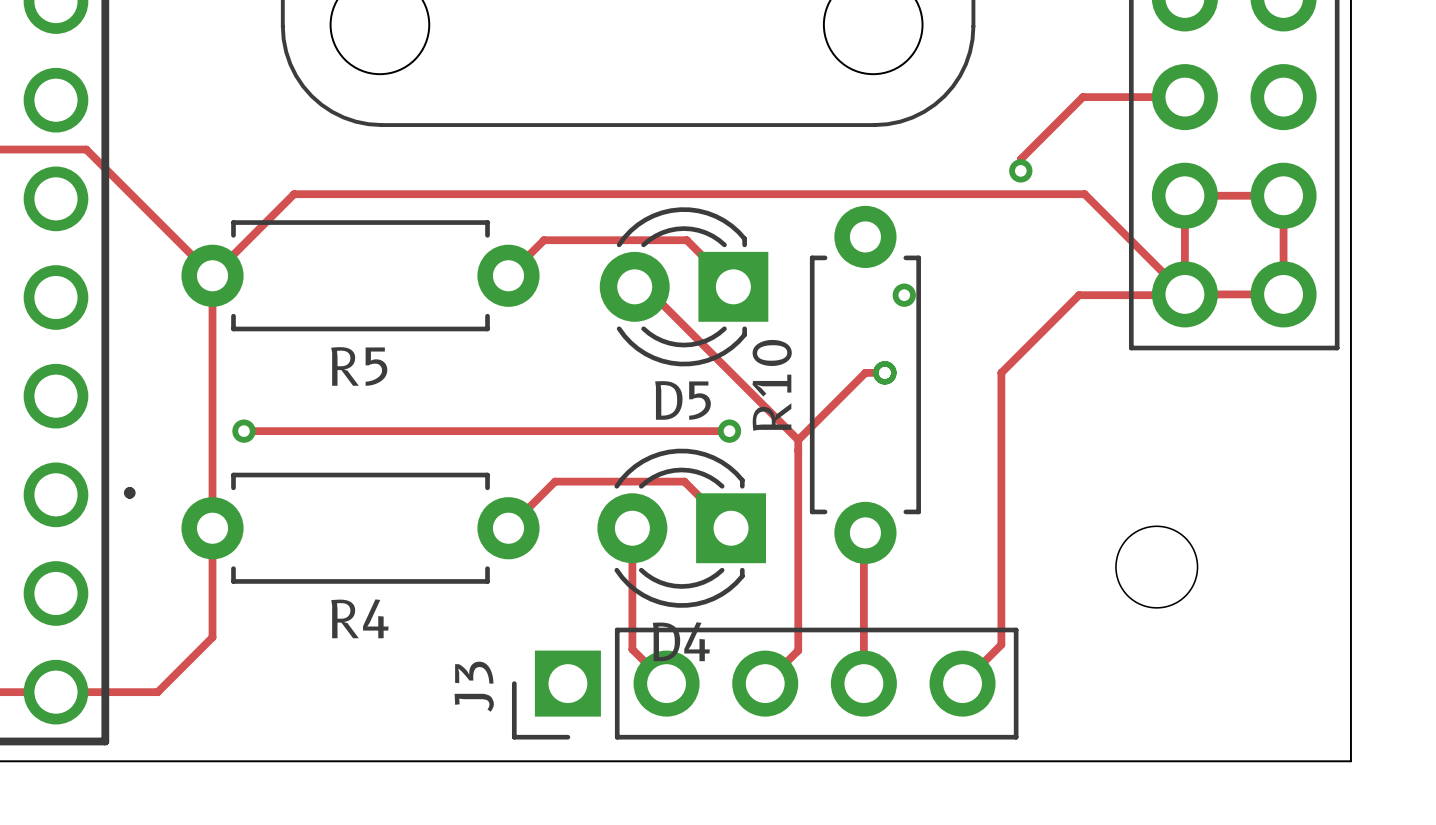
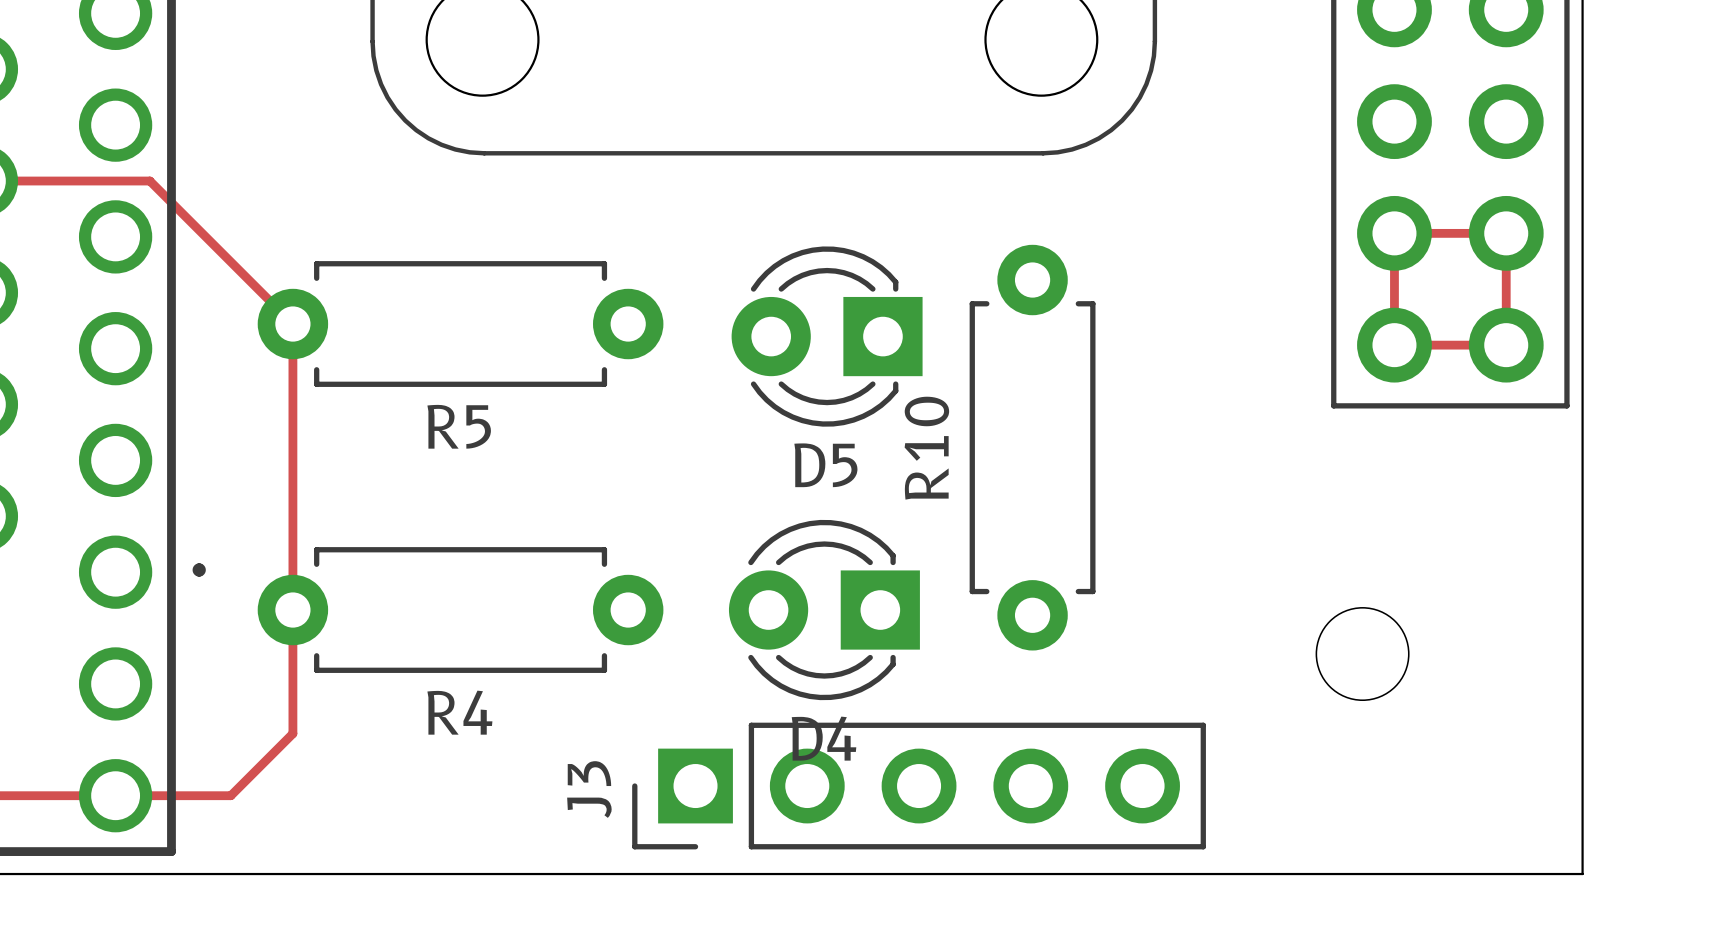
track: (1184, 97) (1082, 97) (1020, 159) (1020, 170) -> none
via: (1020, 170) -> none
track: (212, 275) (294, 194) (1084, 194) (1184, 294) (1079, 295) (1001, 372) (1001, 644) (962, 683) -> none
track: (508, 275) (544, 240) (686, 240) (733, 286) -> none
track: (634, 286) (645, 286) (798, 440) -> none
via: (904, 295) -> none
track: (884, 372) (865, 372) (798, 440) -> none
via: (884, 372) -> none
track: (243, 431) (729, 431) -> none
via: (243, 431) -> none
via: (729, 431) -> none
track: (798, 440) (798, 650) (765, 683) -> none
track: (508, 528) (555, 481) (684, 481) (731, 528) -> none
track: (632, 528) (632, 649) (666, 683) -> none
track: (865, 532) (863, 534) (863, 683) -> none

